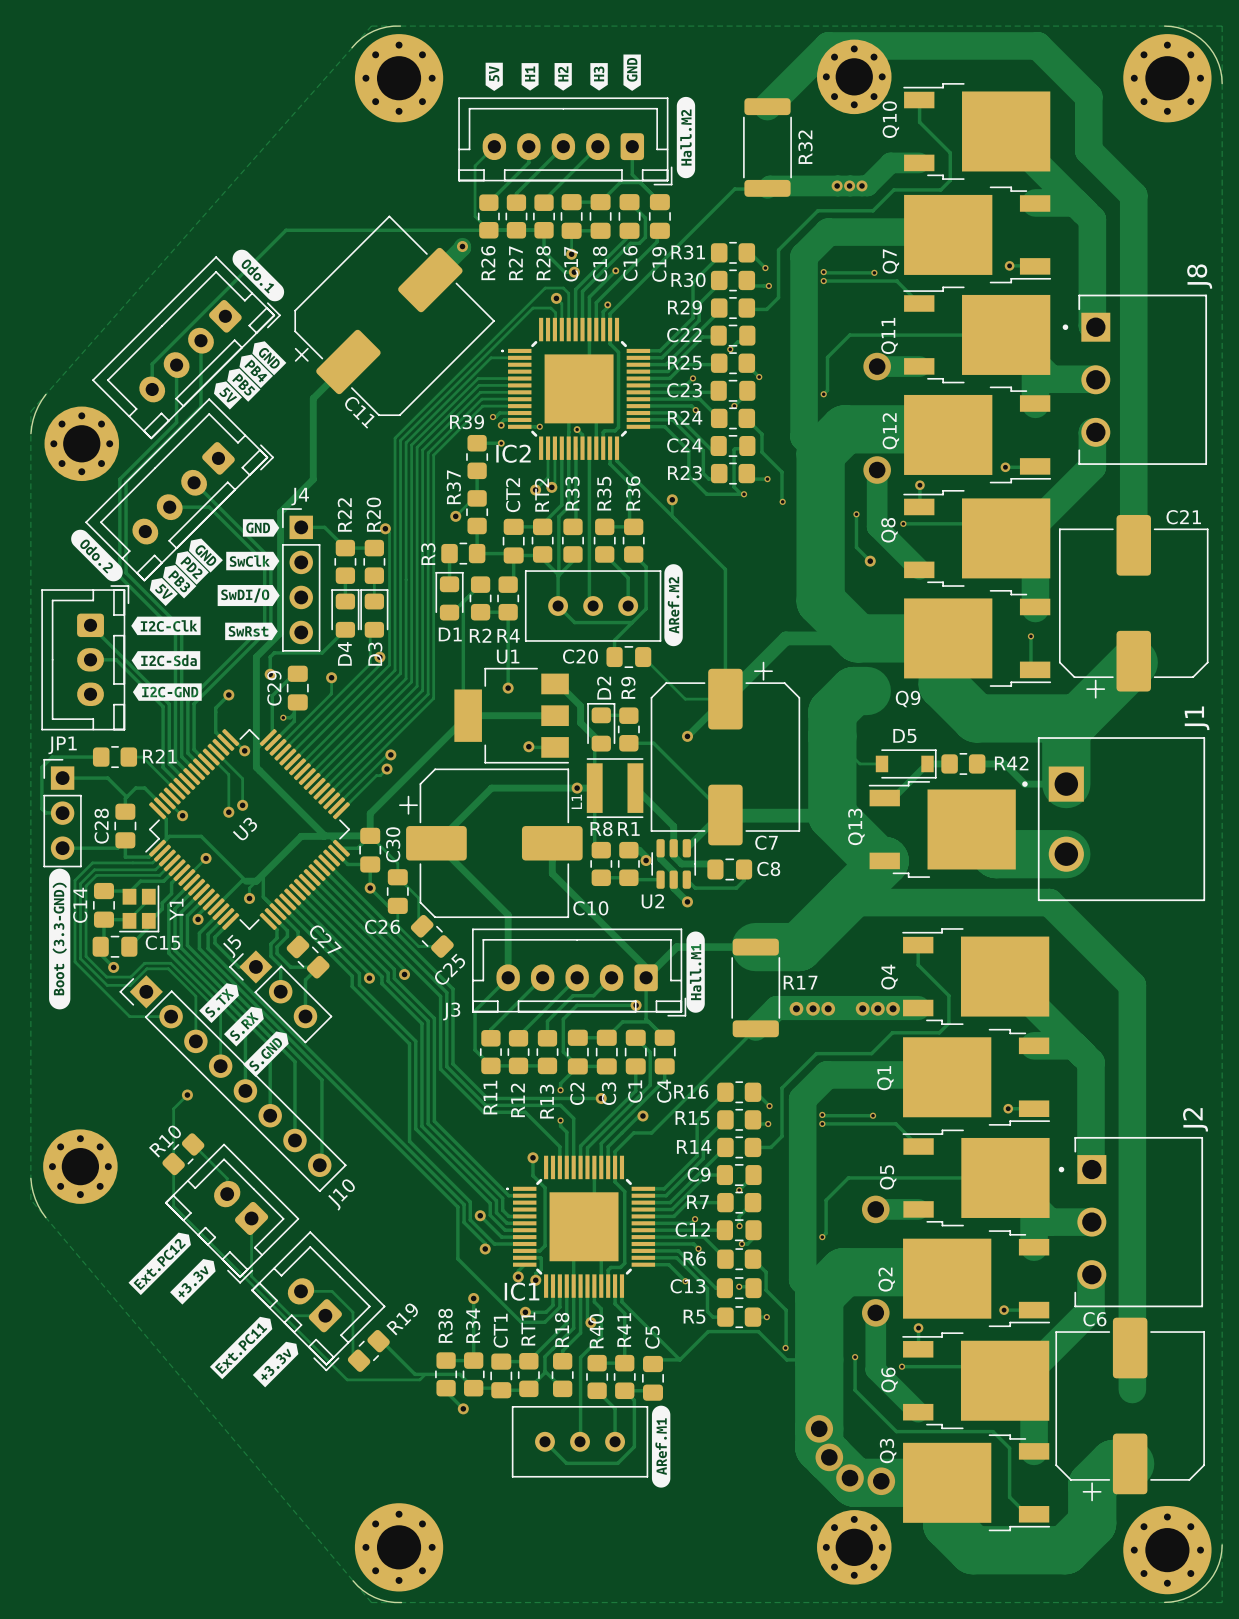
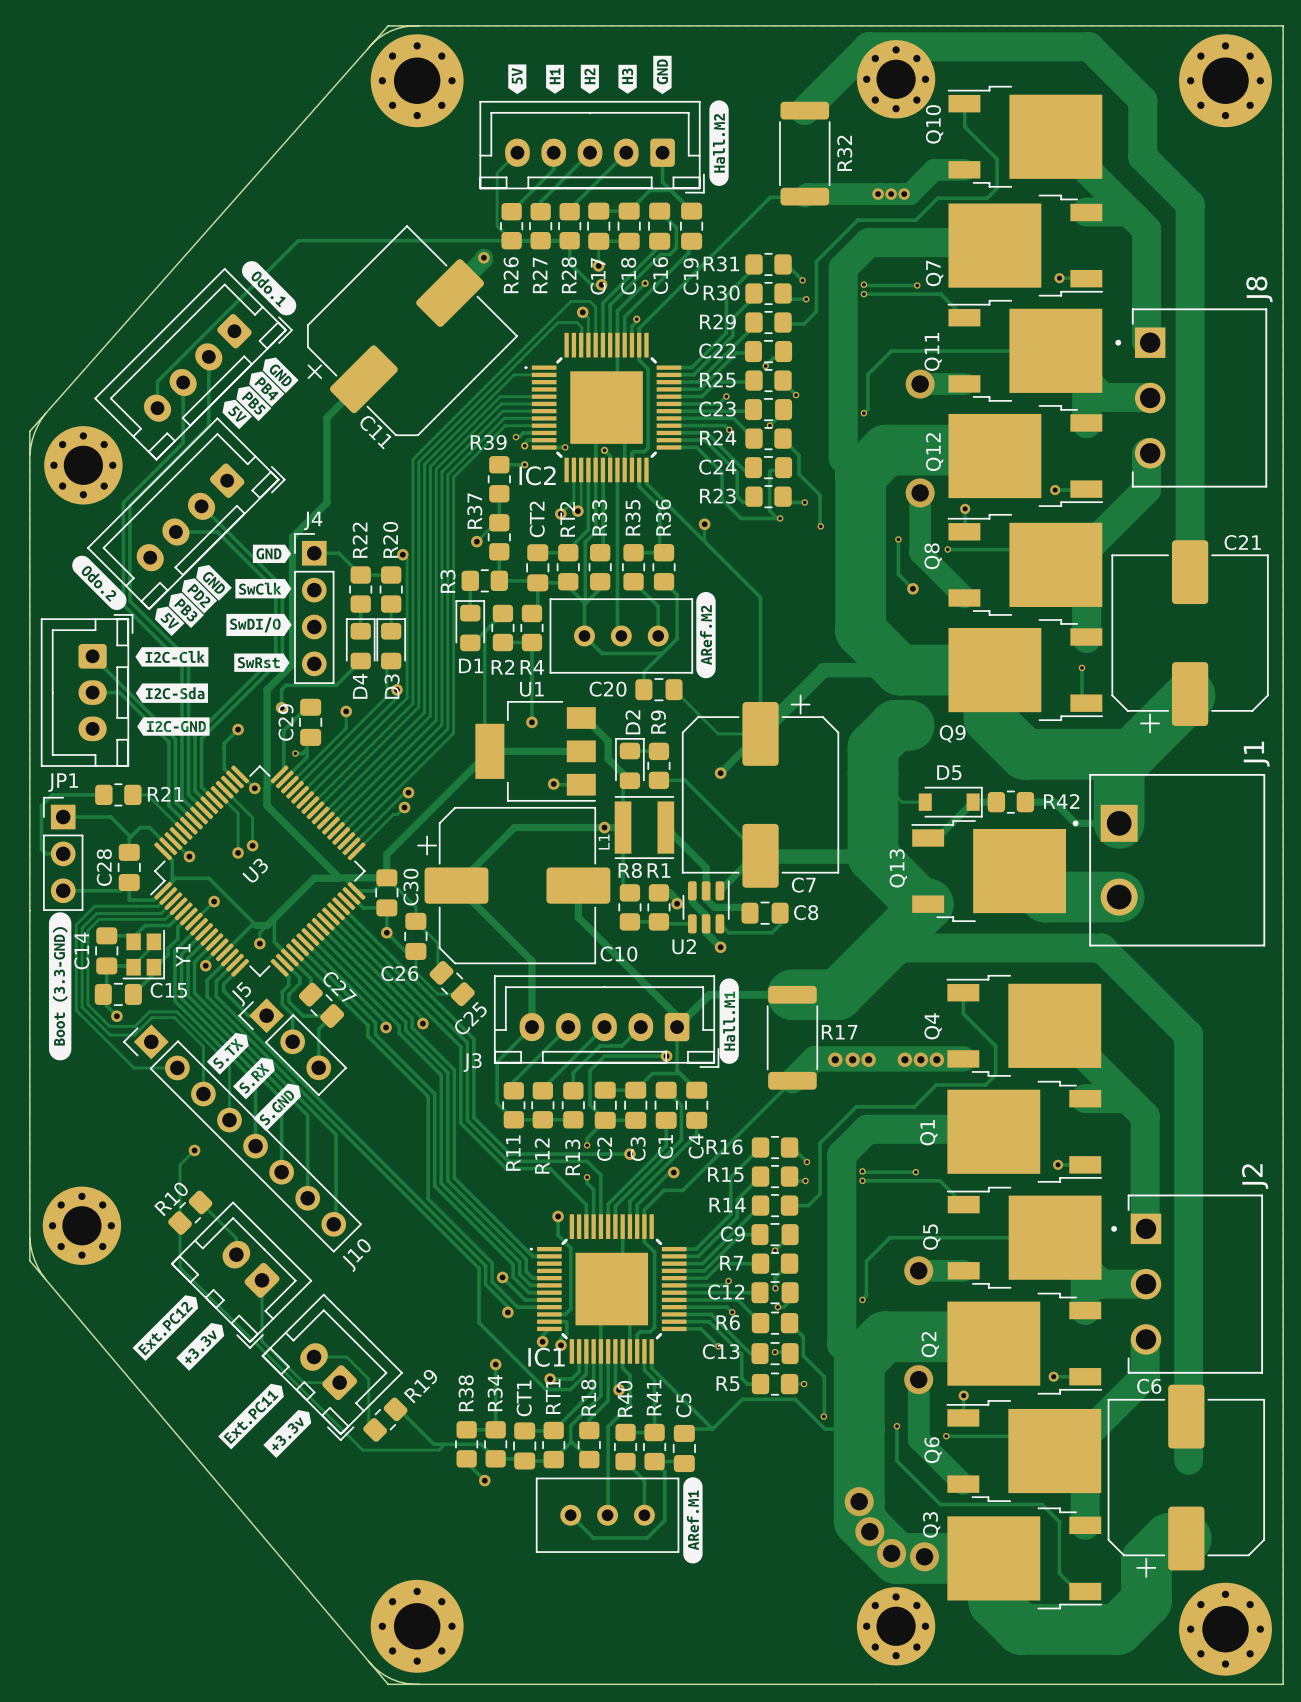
board edge: none -> (388, 25) (1283, 25) (1283, 1684) (388, 1684) (29, 1260) (29, 431) (388, 25)
board edge: (1164, 26) (1183, 29) (1205, 42) (1218, 64) (1222, 83) -> none
board edge: (1222, 1544) (1218, 1563) (1205, 1585) (1183, 1599) (1164, 1602) -> none

